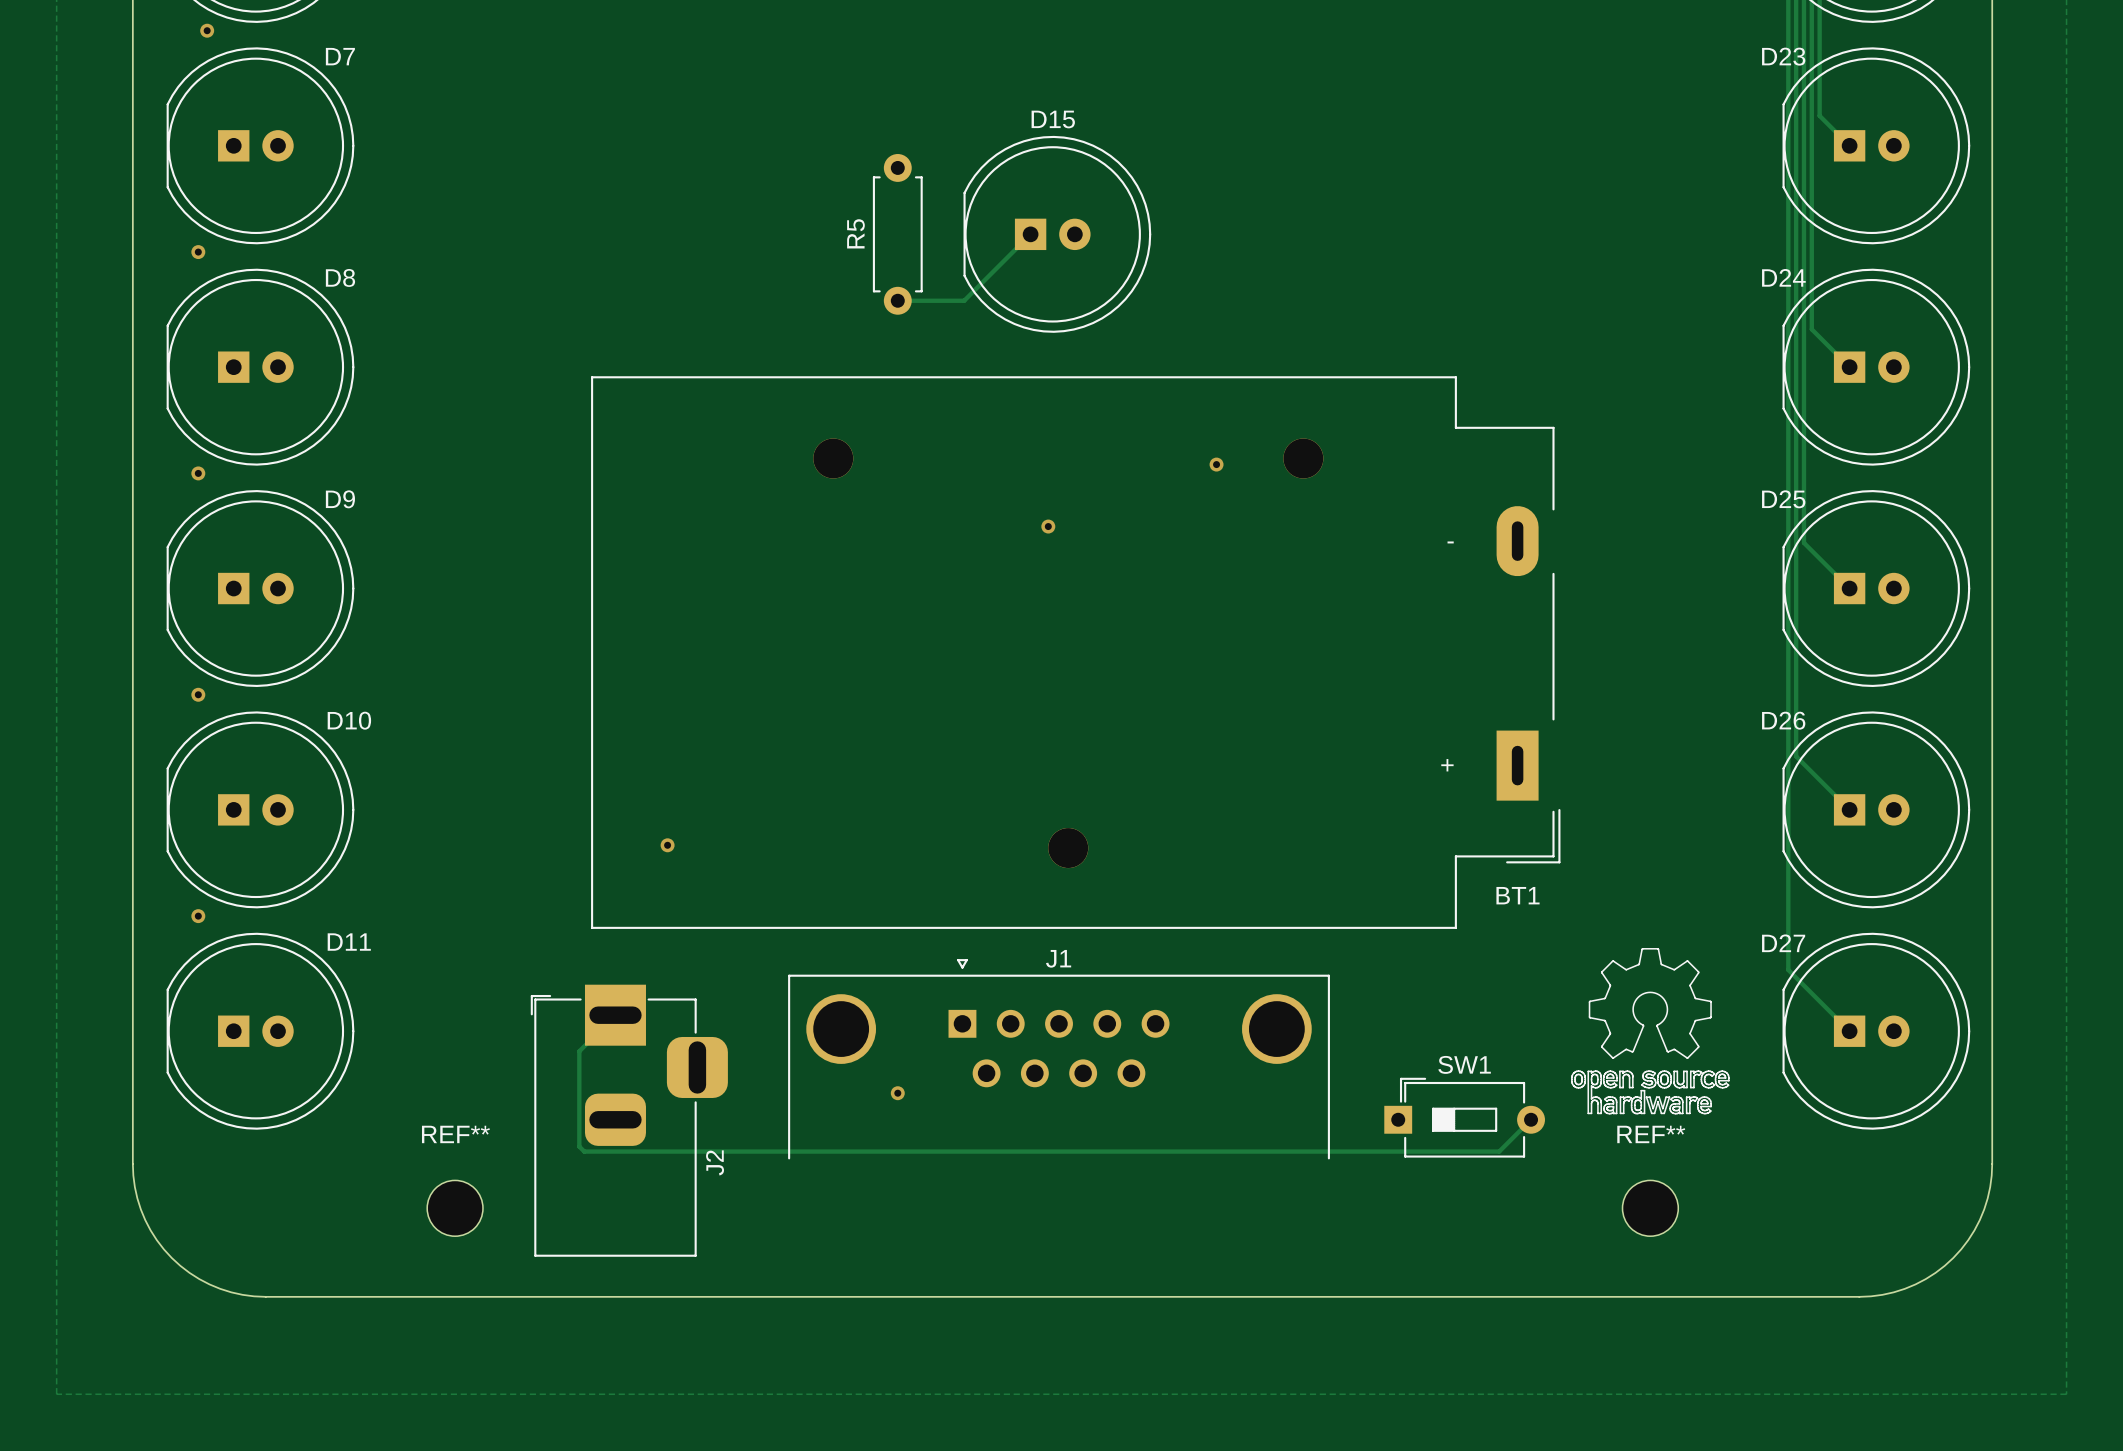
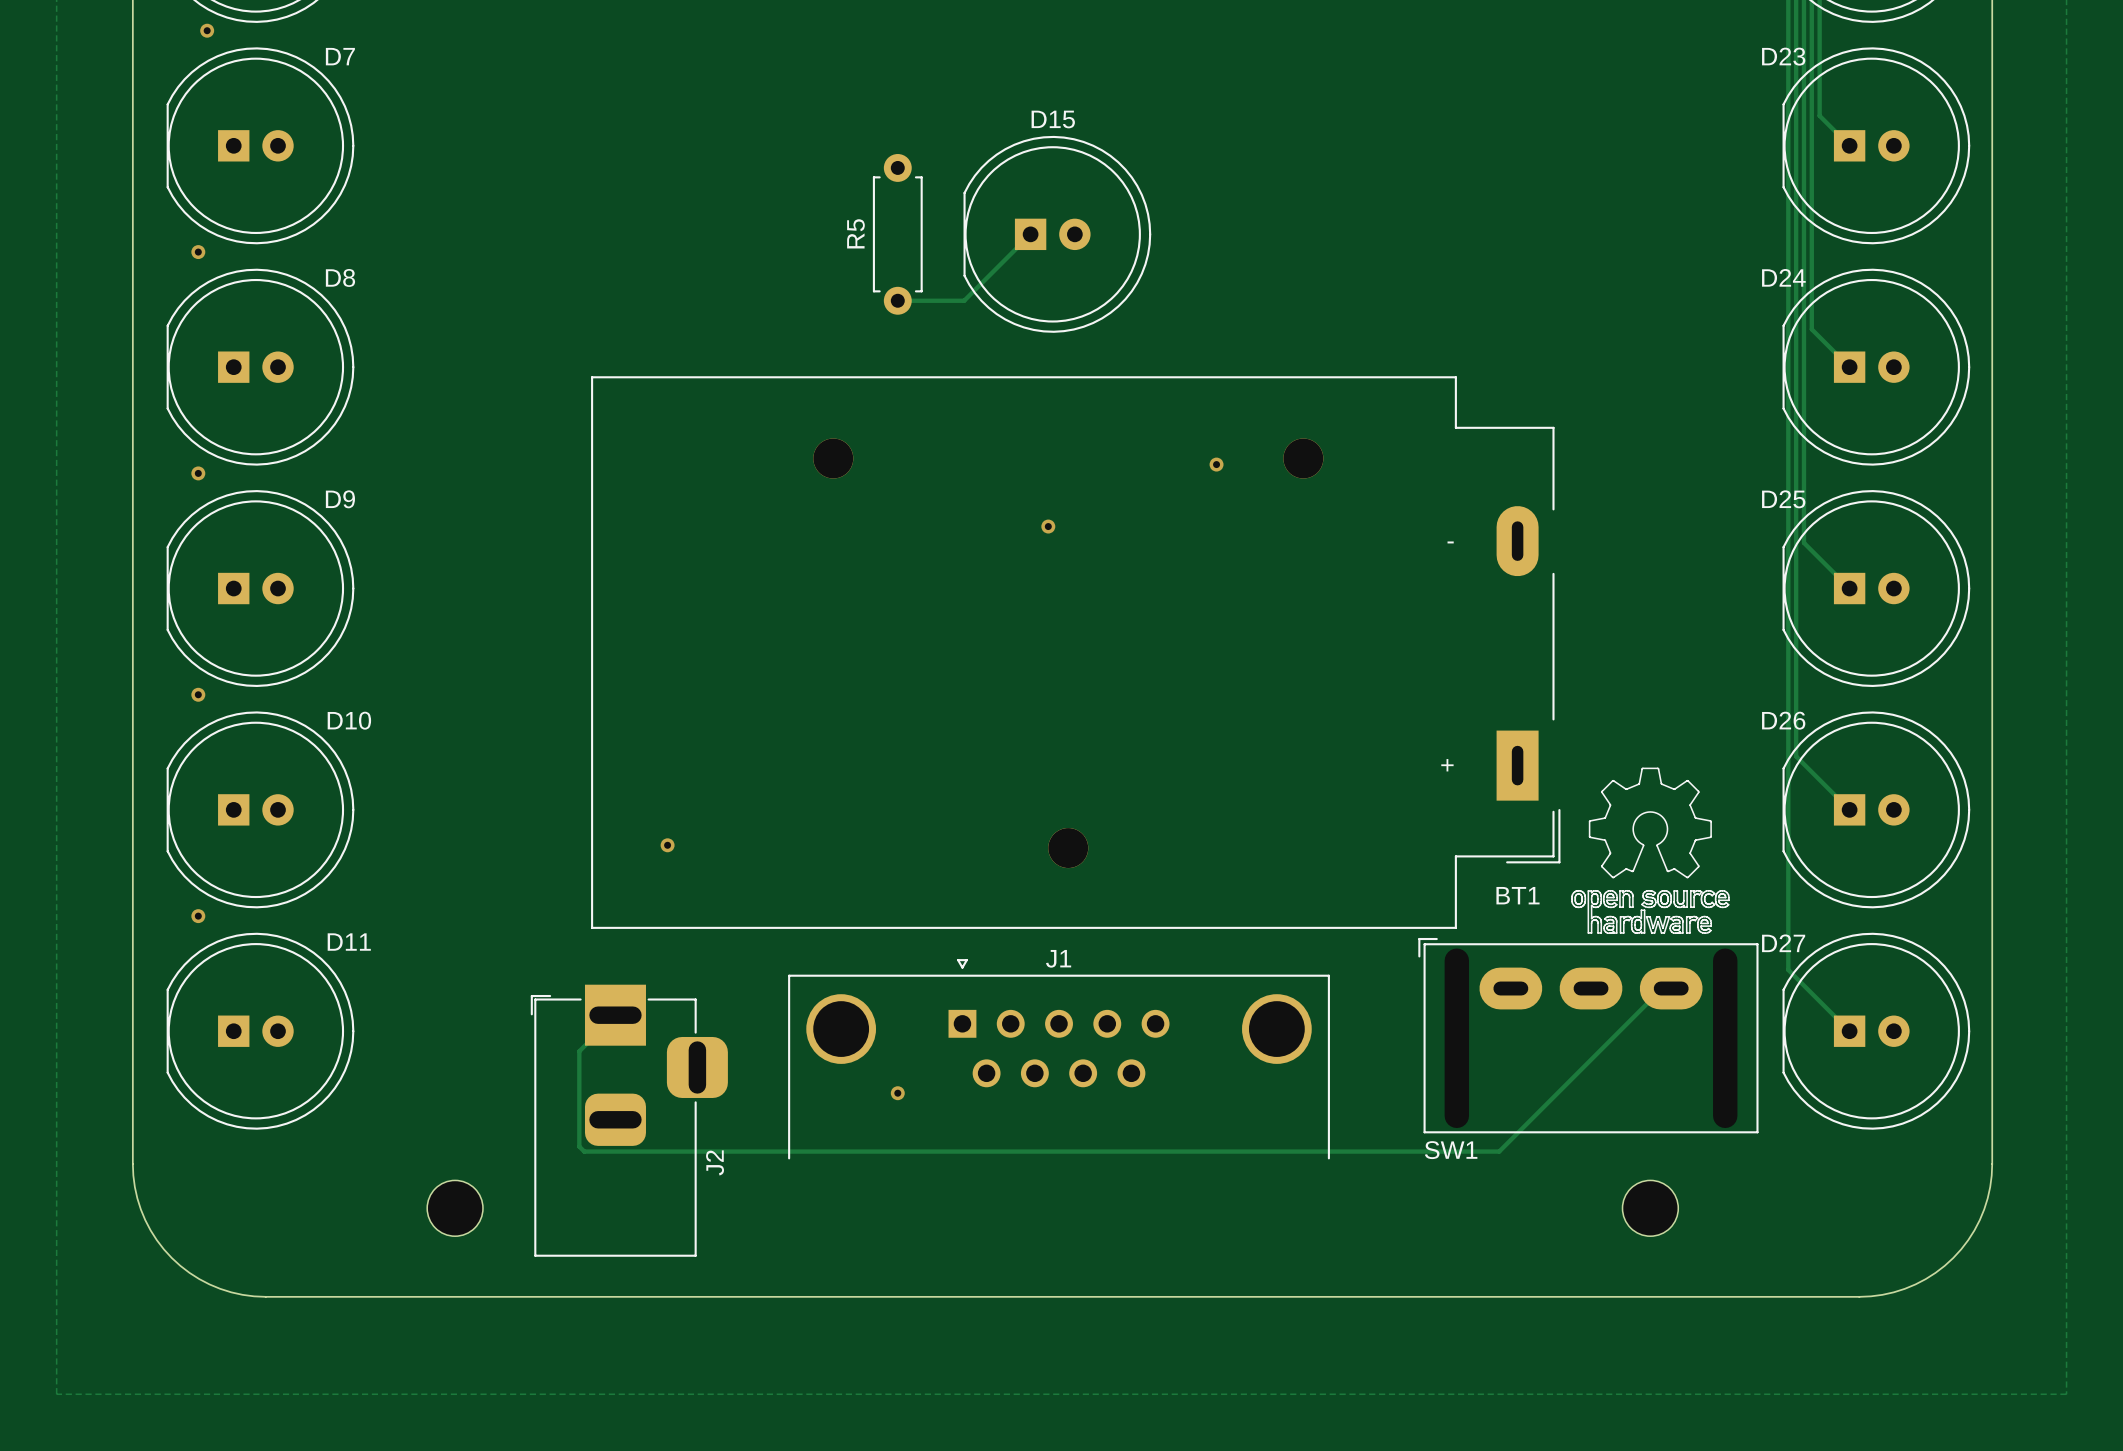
track: none -> (1671, 988) (1662, 988) (1531, 1119)
drawing position: (1650, 1031) -> (1650, 850)
SW1 name position: SW1 (1464, 1064) -> SW1 (1451, 1150)
SW1 footprint: [1384, 1077, 1545, 1158] -> [1418, 937, 1759, 1134]
REF** name: REF** (455, 1134) -> none
REF** name: REF** (1651, 1134) -> none

